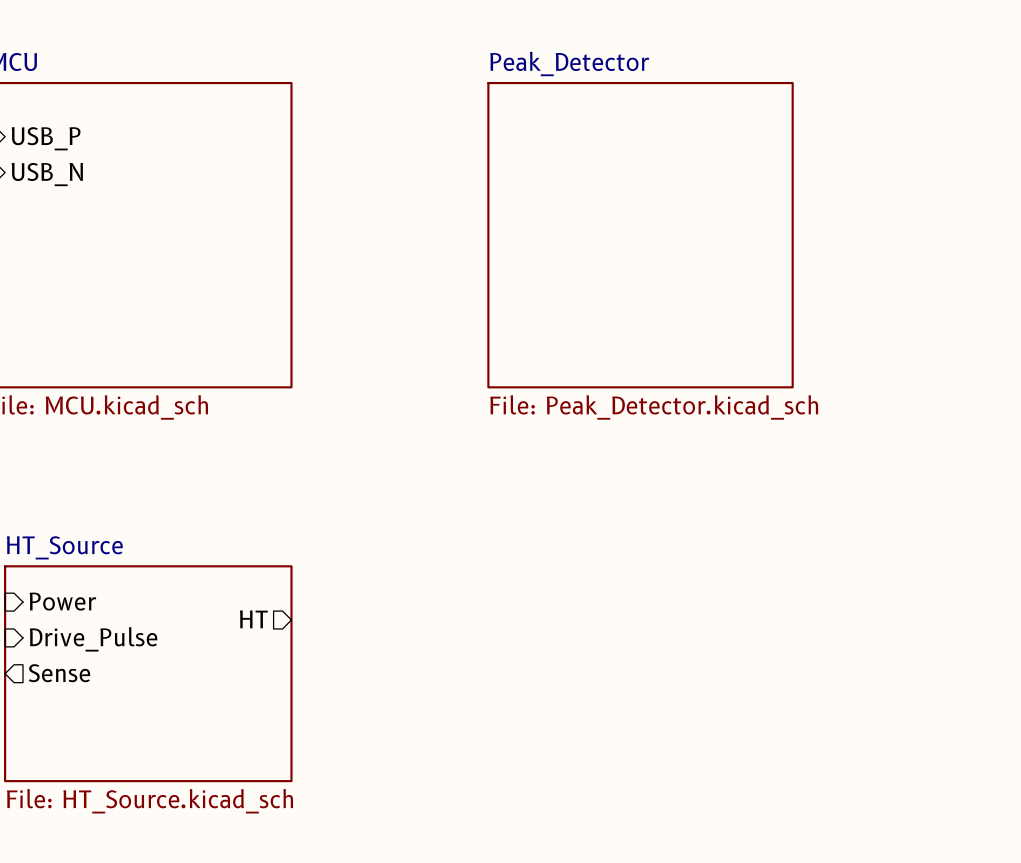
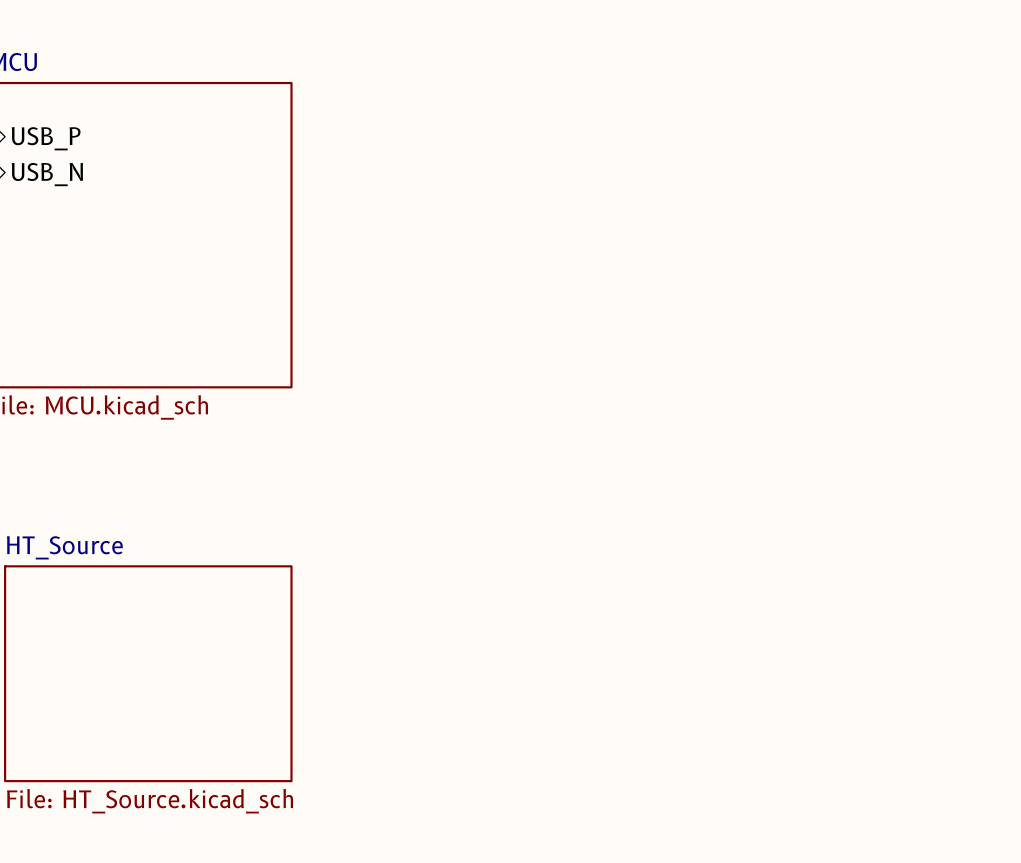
sheet Peak_Detector: File: Peak_Detector.kicad_sch (640, 235) -> none
sheet pin: Power (62, 601) -> none
sheet pin: HT (253, 619) -> none
sheet pin: Drive_Pulse (93, 639) -> none
sheet pin: Sense (59, 673) -> none

